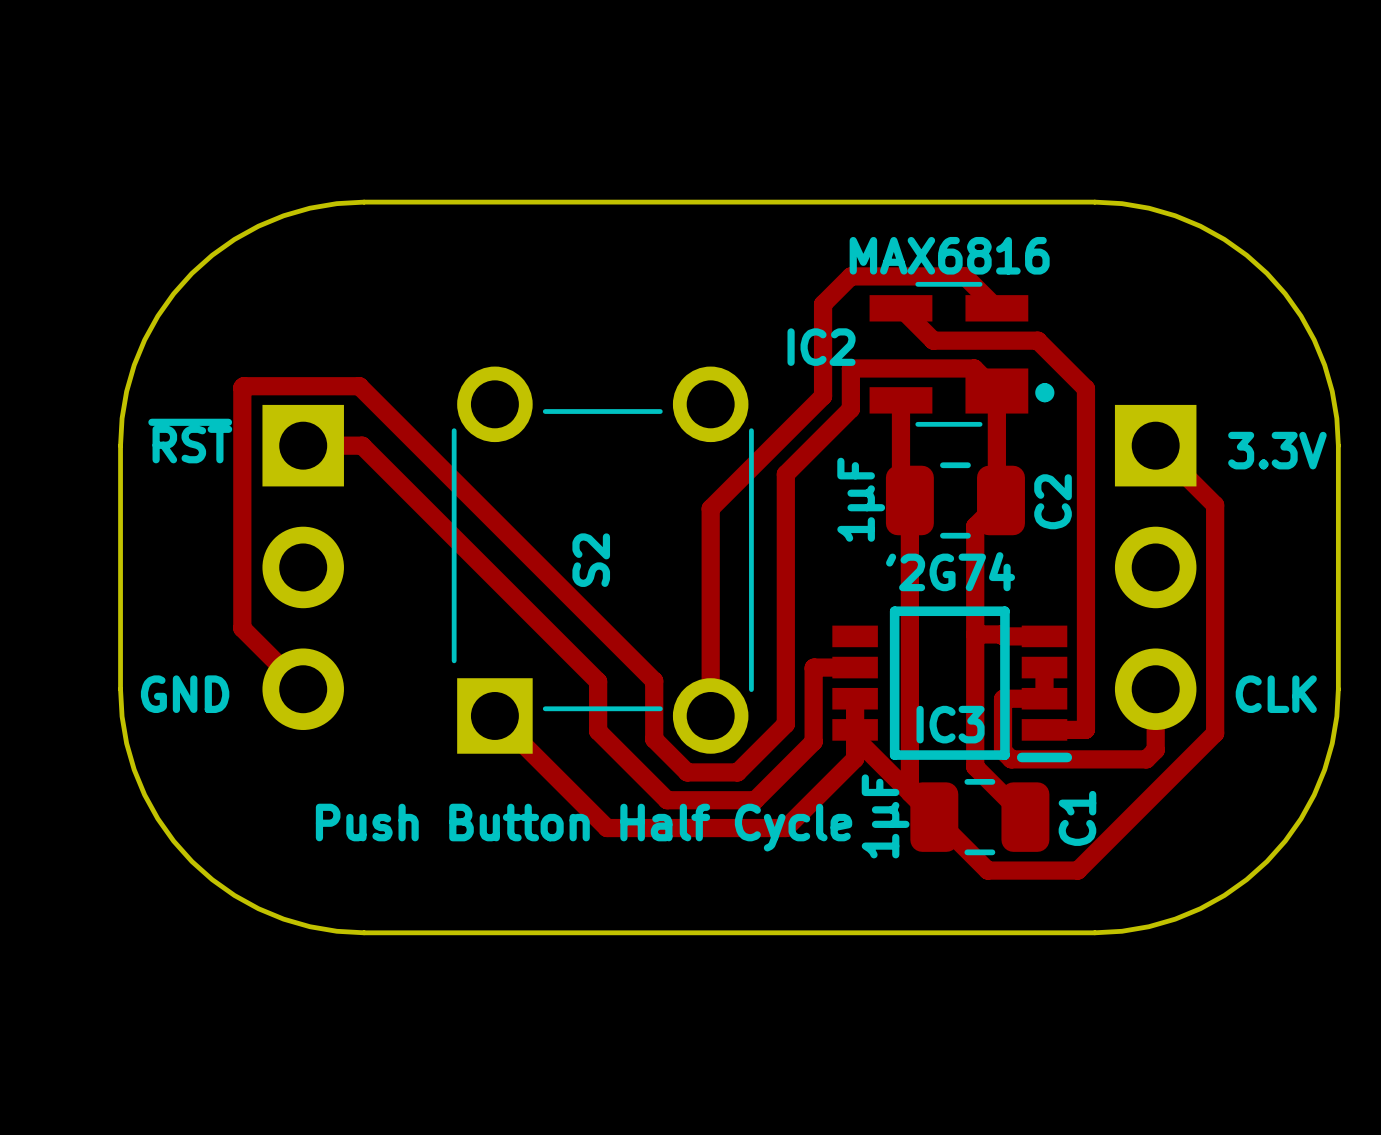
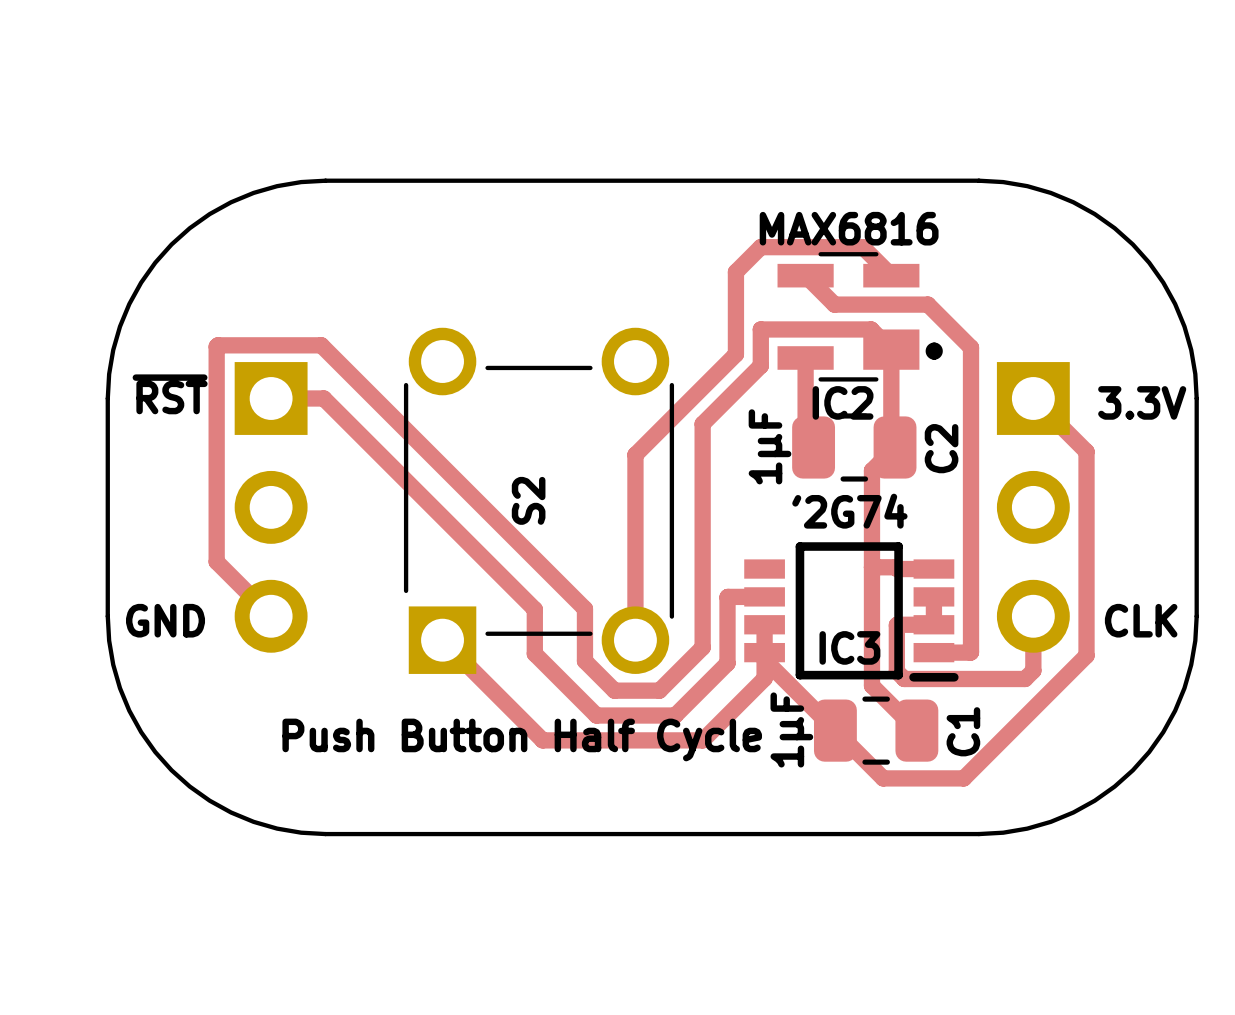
IC2 name position: IC2 (821, 347) -> IC2 (843, 402)
top track: (909, 500) (909, 792) -> none

